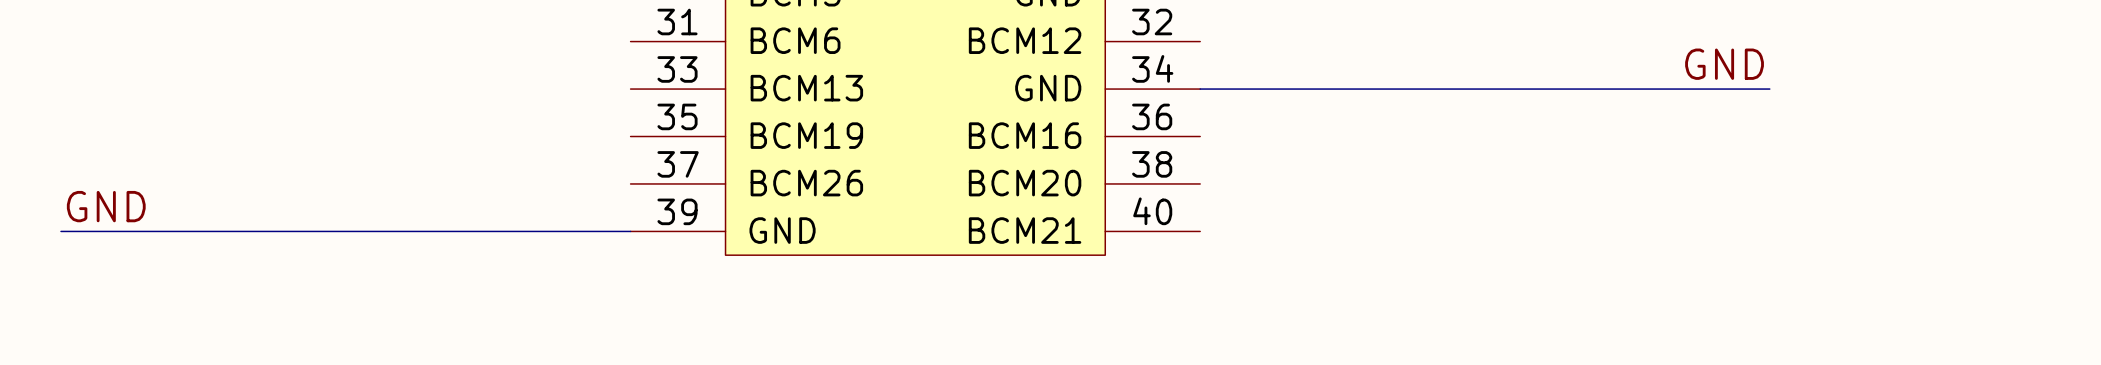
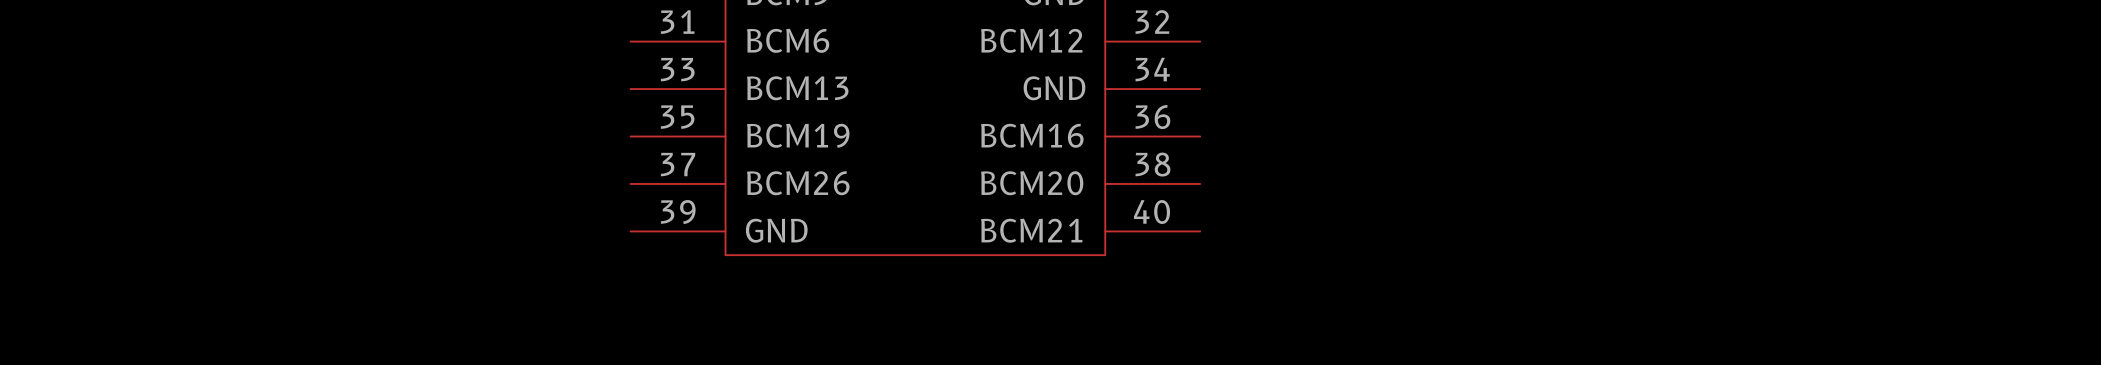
label: GND (1724, 64) -> none
wire: (1200, 89) (1769, 89) -> none
label: GND (106, 206) -> none
wire: (60, 231) (630, 231) -> none

